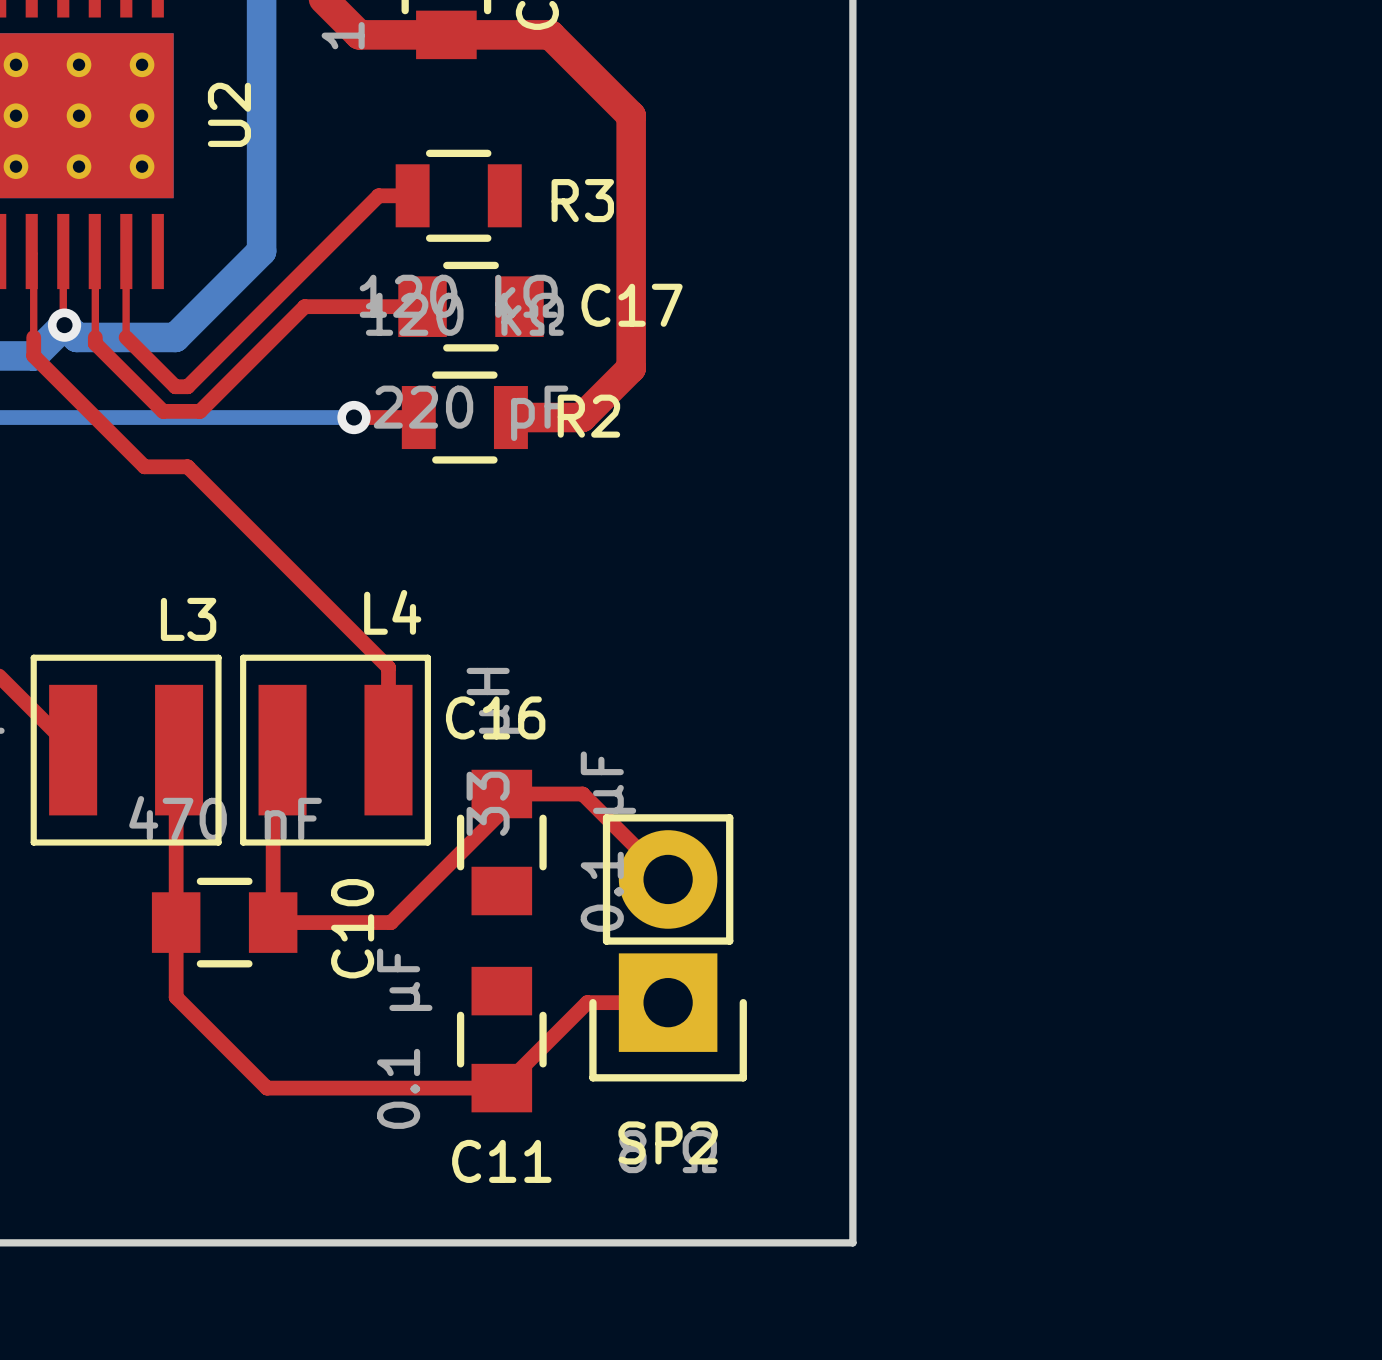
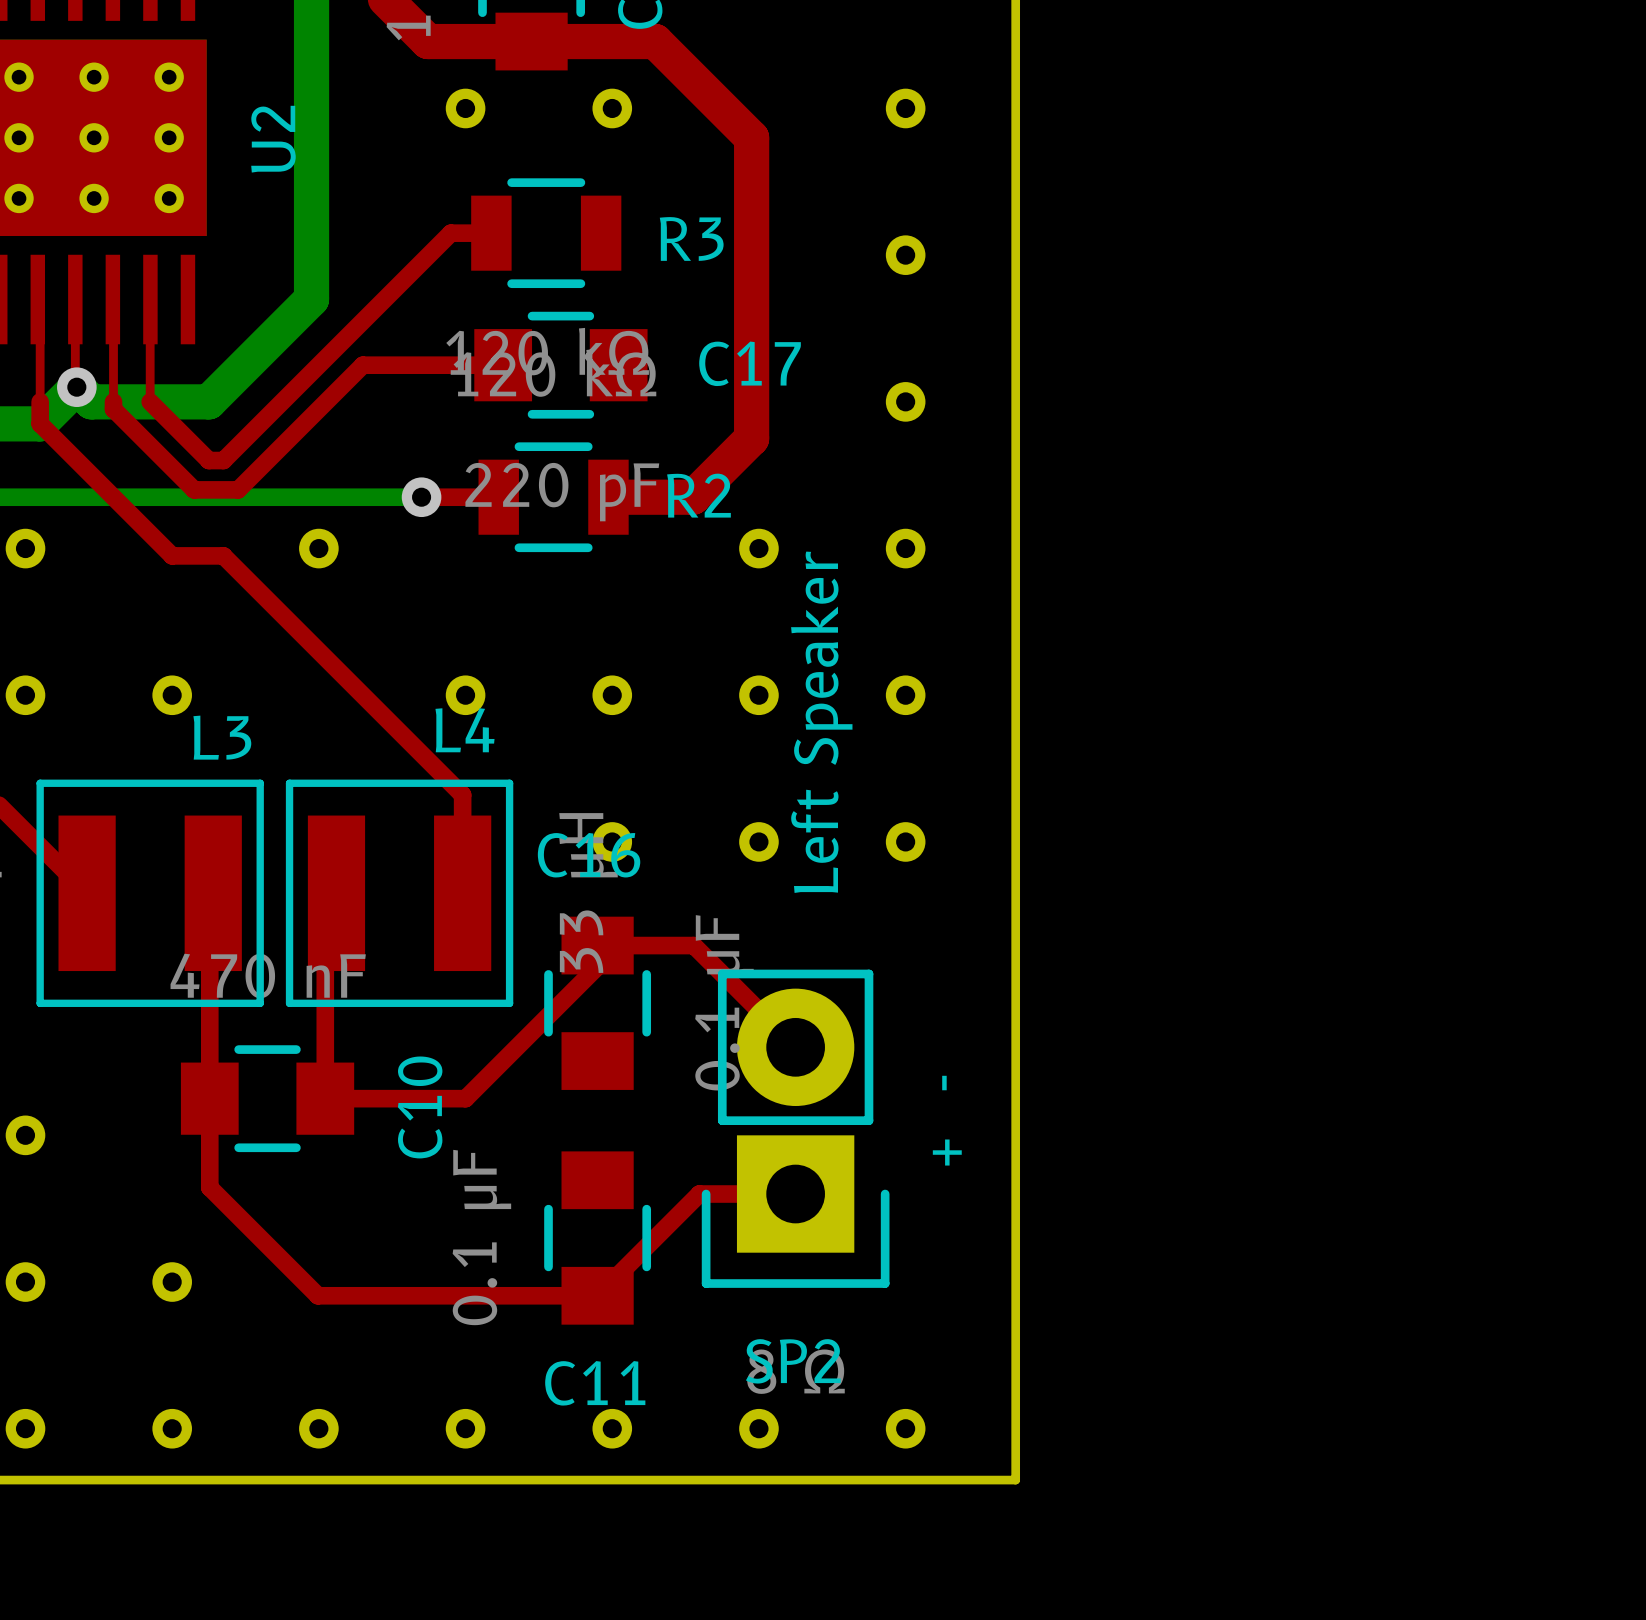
part: none -> (465, 108)
part: none -> (612, 108)
part: none -> (905, 108)
part: none -> (905, 255)
part: none -> (905, 401)
part: none -> (25, 548)
part: none -> (318, 548)
part: none -> (758, 548)
part: none -> (905, 548)
part: none -> (25, 695)
part: none -> (172, 695)
part: none -> (465, 695)
part: none -> (612, 695)
part: none -> (758, 695)
part: none -> (905, 695)
text: none -> Left Speaker (821, 722)
part: none -> (612, 841)
part: none -> (758, 841)
part: none -> (905, 841)
text: none -> - + (947, 1120)
part: none -> (25, 1135)
part: none -> (25, 1282)
part: none -> (172, 1282)
part: none -> (25, 1428)
part: none -> (172, 1428)
part: none -> (318, 1428)
part: none -> (465, 1428)
part: none -> (612, 1428)
part: none -> (758, 1428)
part: none -> (905, 1428)

